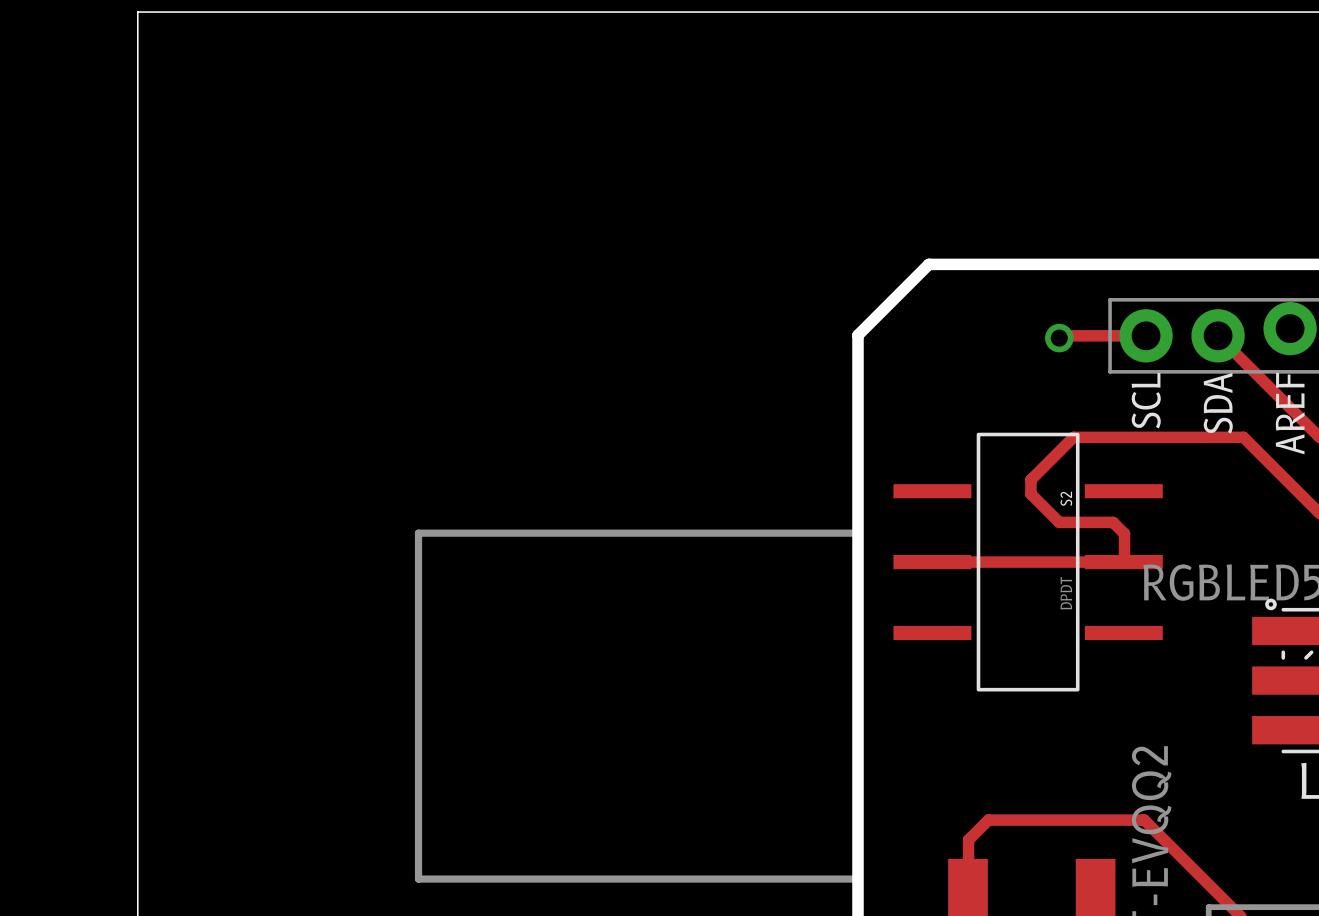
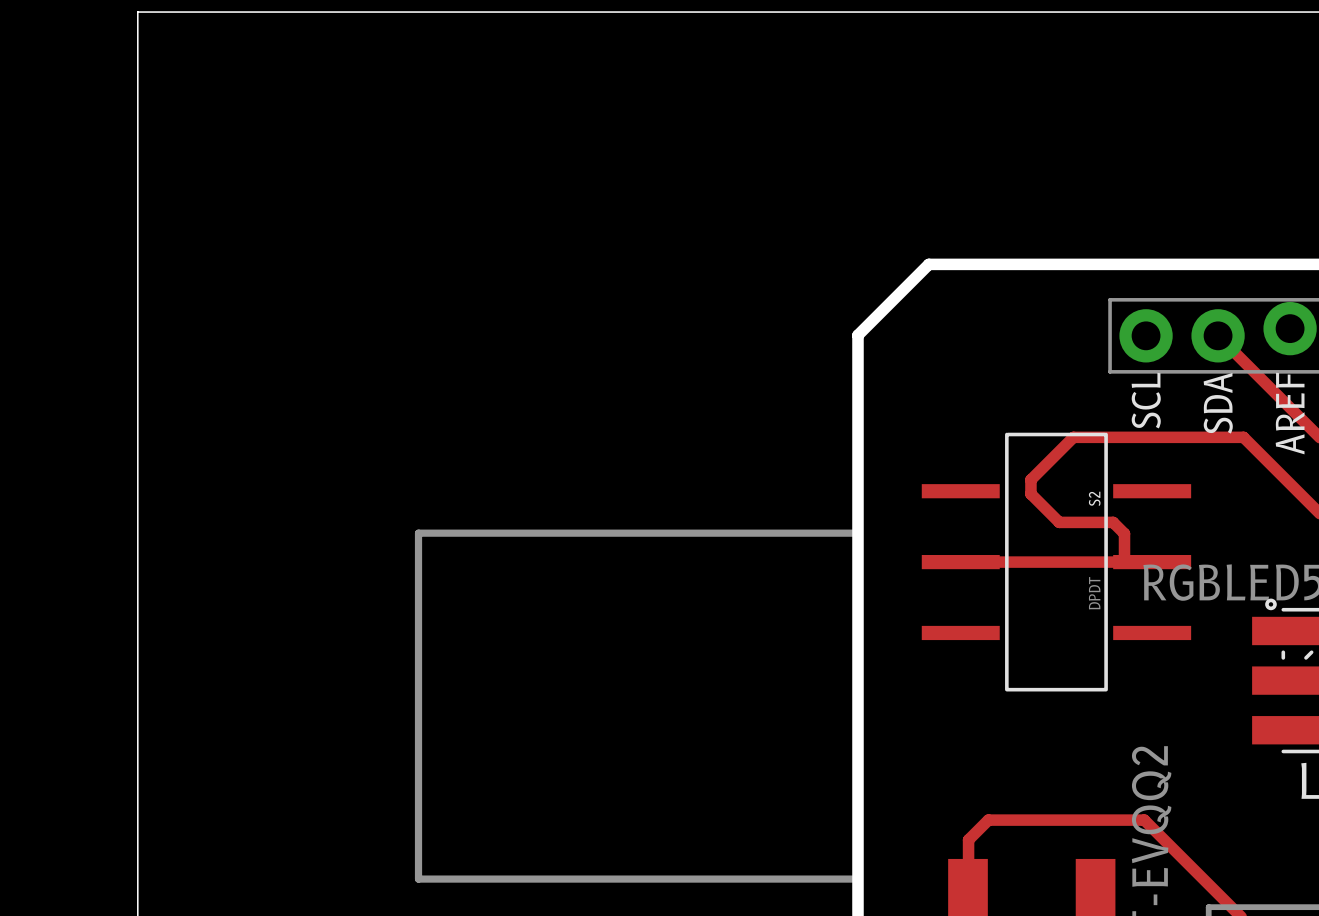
track: (1146, 335) (1061, 335) (1059, 338) -> none
via: (1059, 338) -> none
S2 position: (1028, 562) -> (1056, 562)

